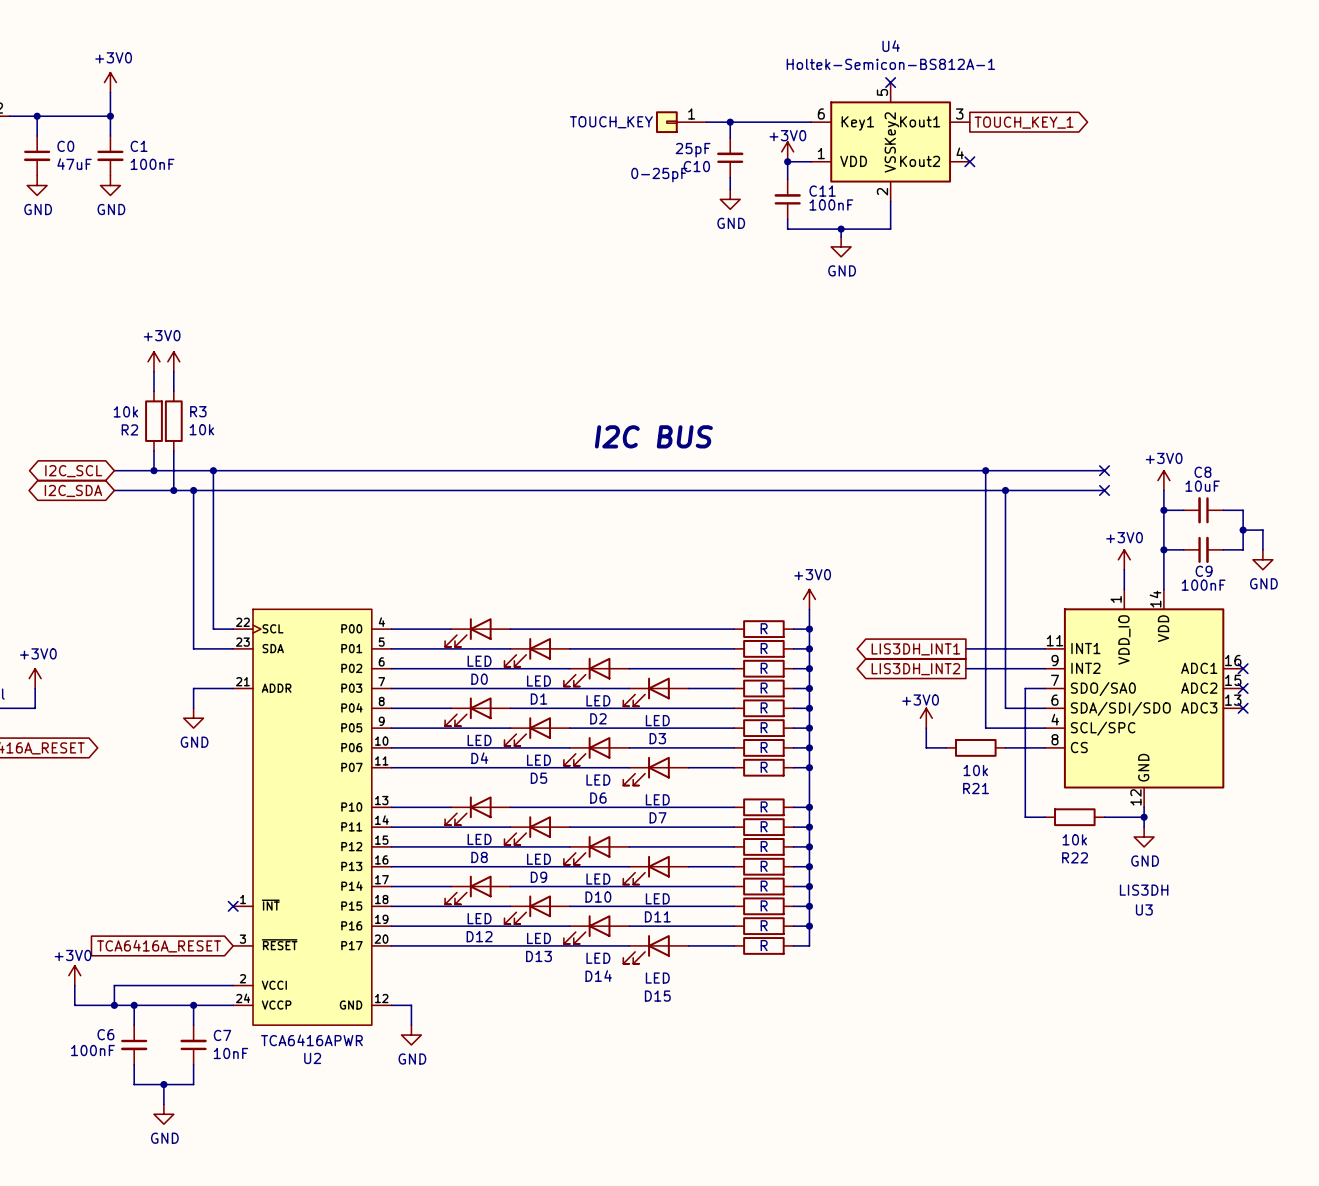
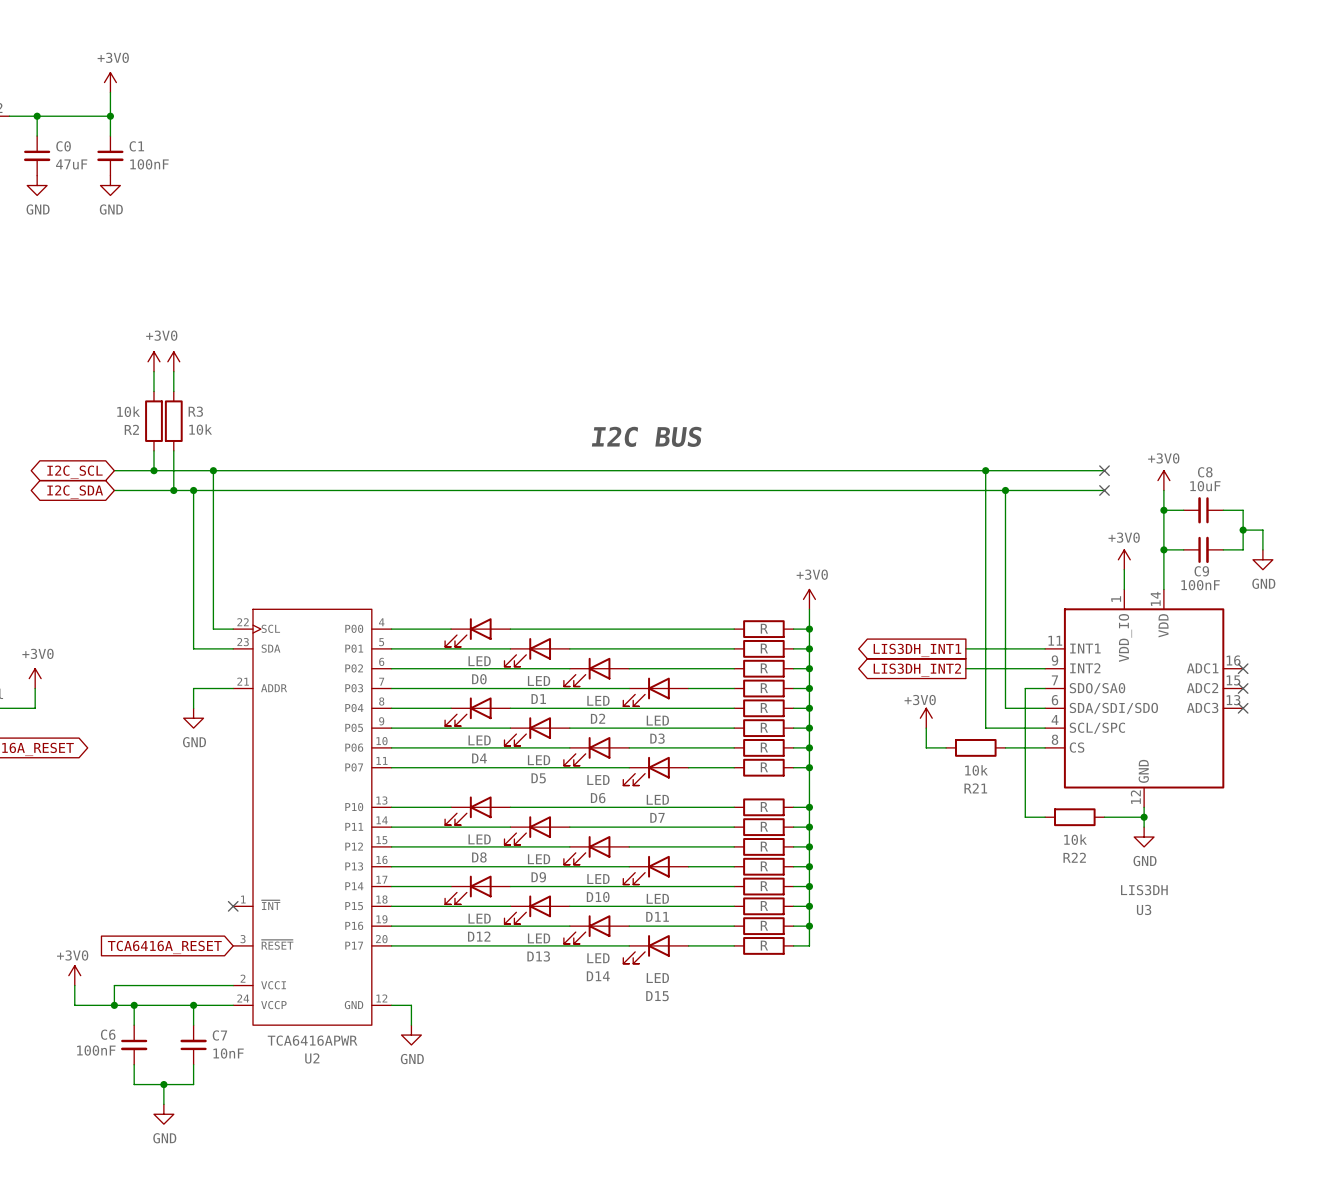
no-connect mark: (890, 82) -> none
part: TOUCH_KEY (681, 122) -> none
wire: (706, 122) (811, 122) -> none
wire: (730, 122) (730, 138) -> none
junction: (730, 122) -> none
global label: TOUCH_KEY_1 (1024, 122) -> none
U4: Holtek-Semicon-BS812A-1 (890, 141) -> none
power symbol: +3V0 (787, 151) -> none
C10: 25pF (730, 157) -> none
junction: (787, 161) -> none
wire: (811, 161) (787, 161) (787, 179) -> none
no-connect mark: (969, 161) -> none
text: 0-25pF (659, 175) -> none
wire: (730, 177) (730, 189) -> none
power symbol: GND (730, 199) -> none
C11: 100nF (787, 199) -> none
wire: (890, 201) (890, 229) (787, 229) (787, 219) -> none
wire: (841, 229) (841, 237) -> none
junction: (841, 229) -> none
power symbol: GND (841, 246) -> none

